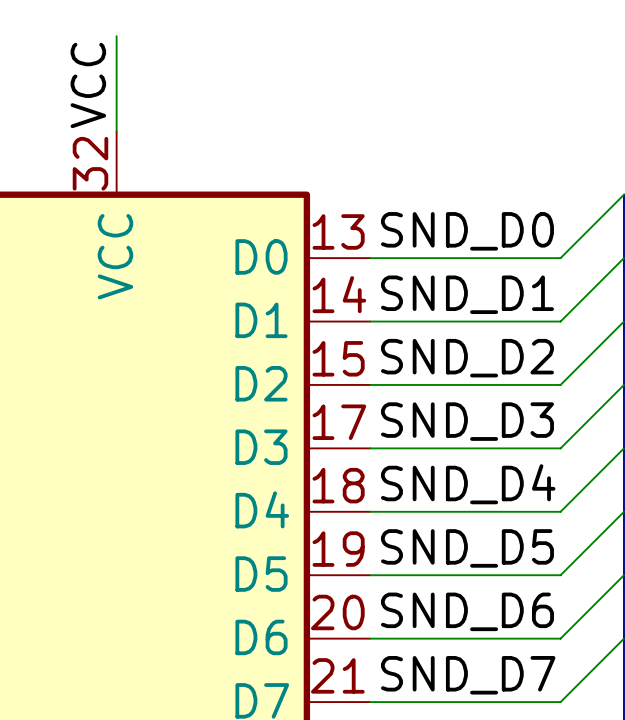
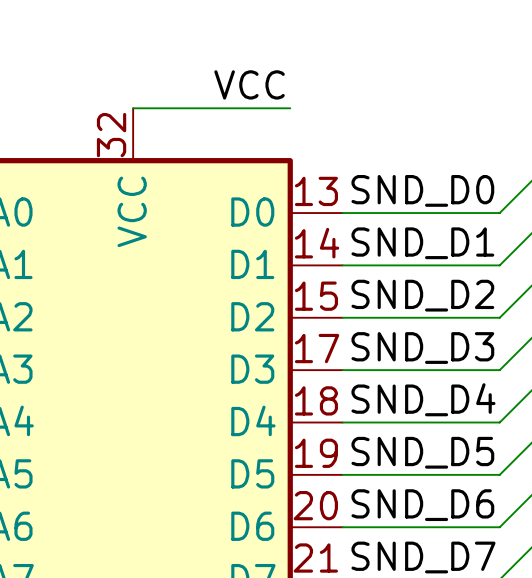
wire: (116, 36) (116, 131) -> (290, 108) (133, 108)
label rotation: 0° (88, 85) -> 90° clockwise (249, 84)
label position: VCC (88, 85) -> VCC (249, 84)

